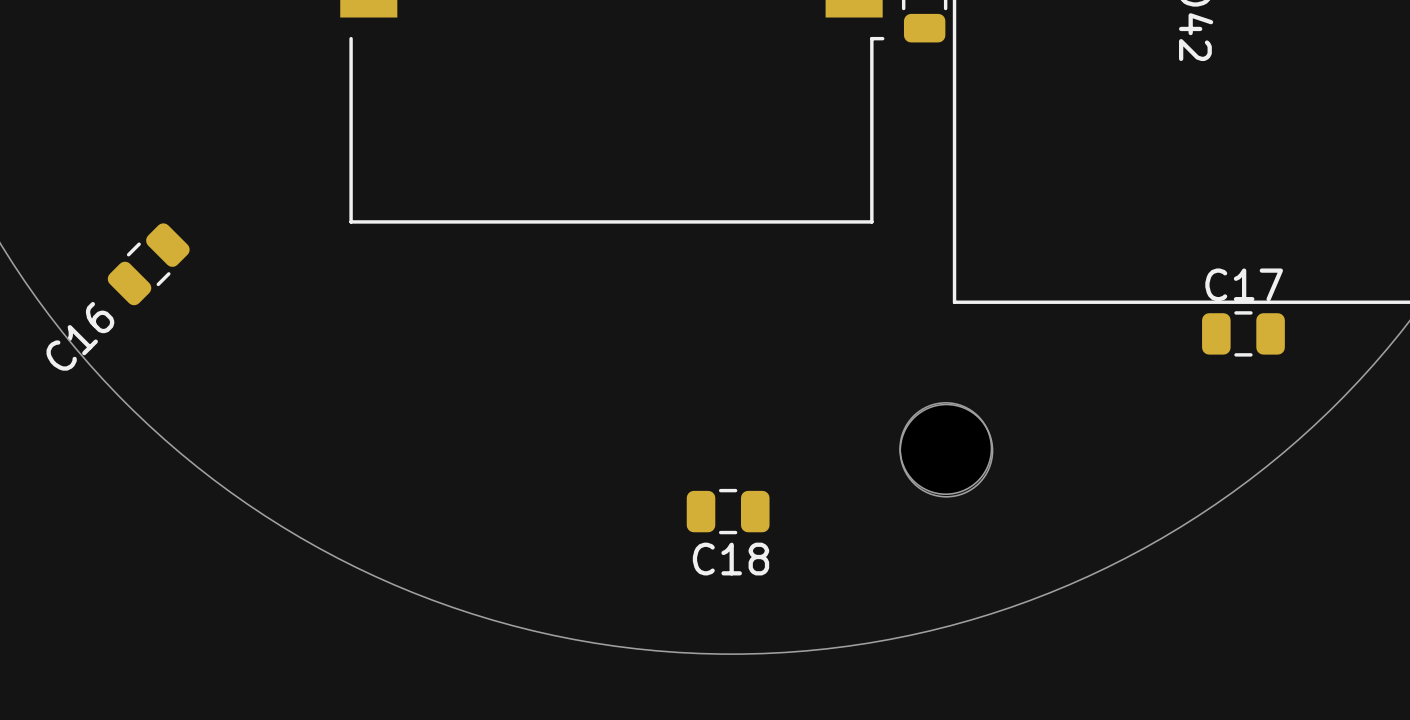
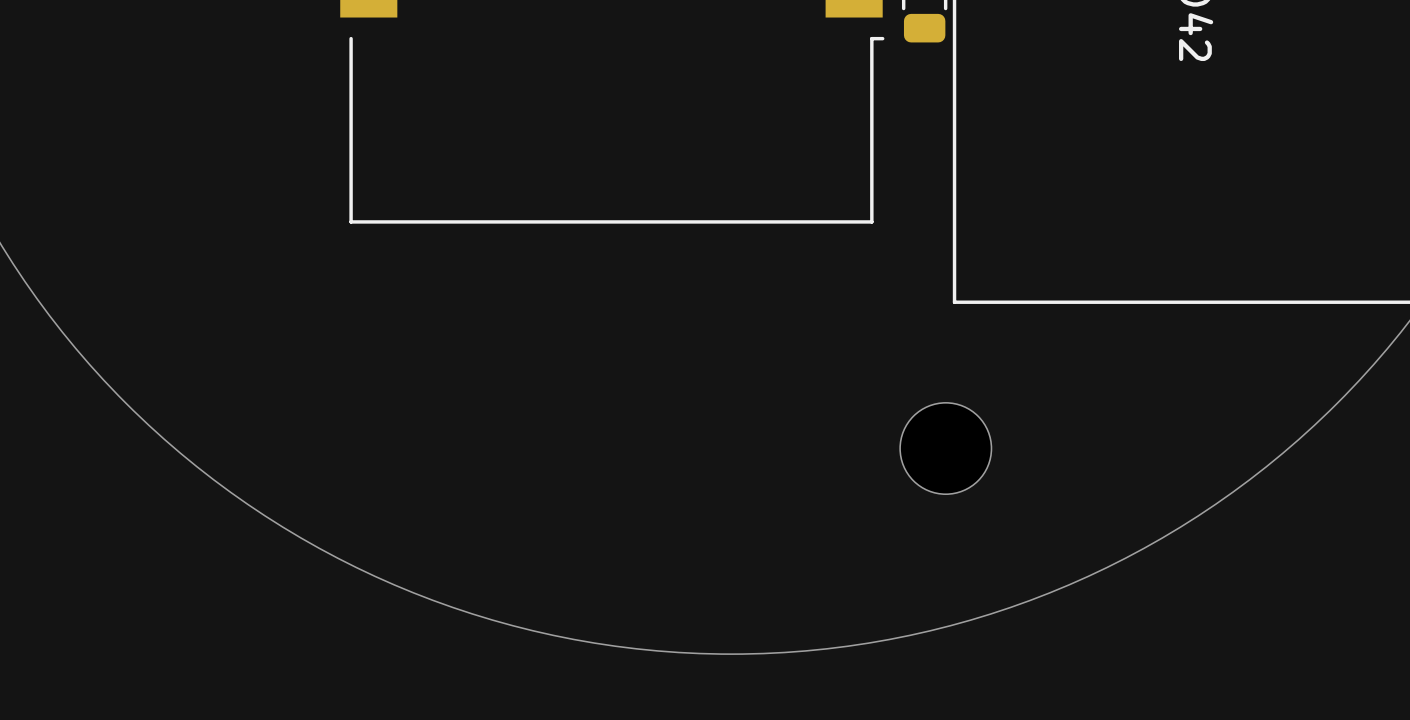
C16: (148, 264) -> none
C17: (1243, 333) -> none
round board edge: [899, 403, 994, 498] -> none
C18: (728, 511) -> none

